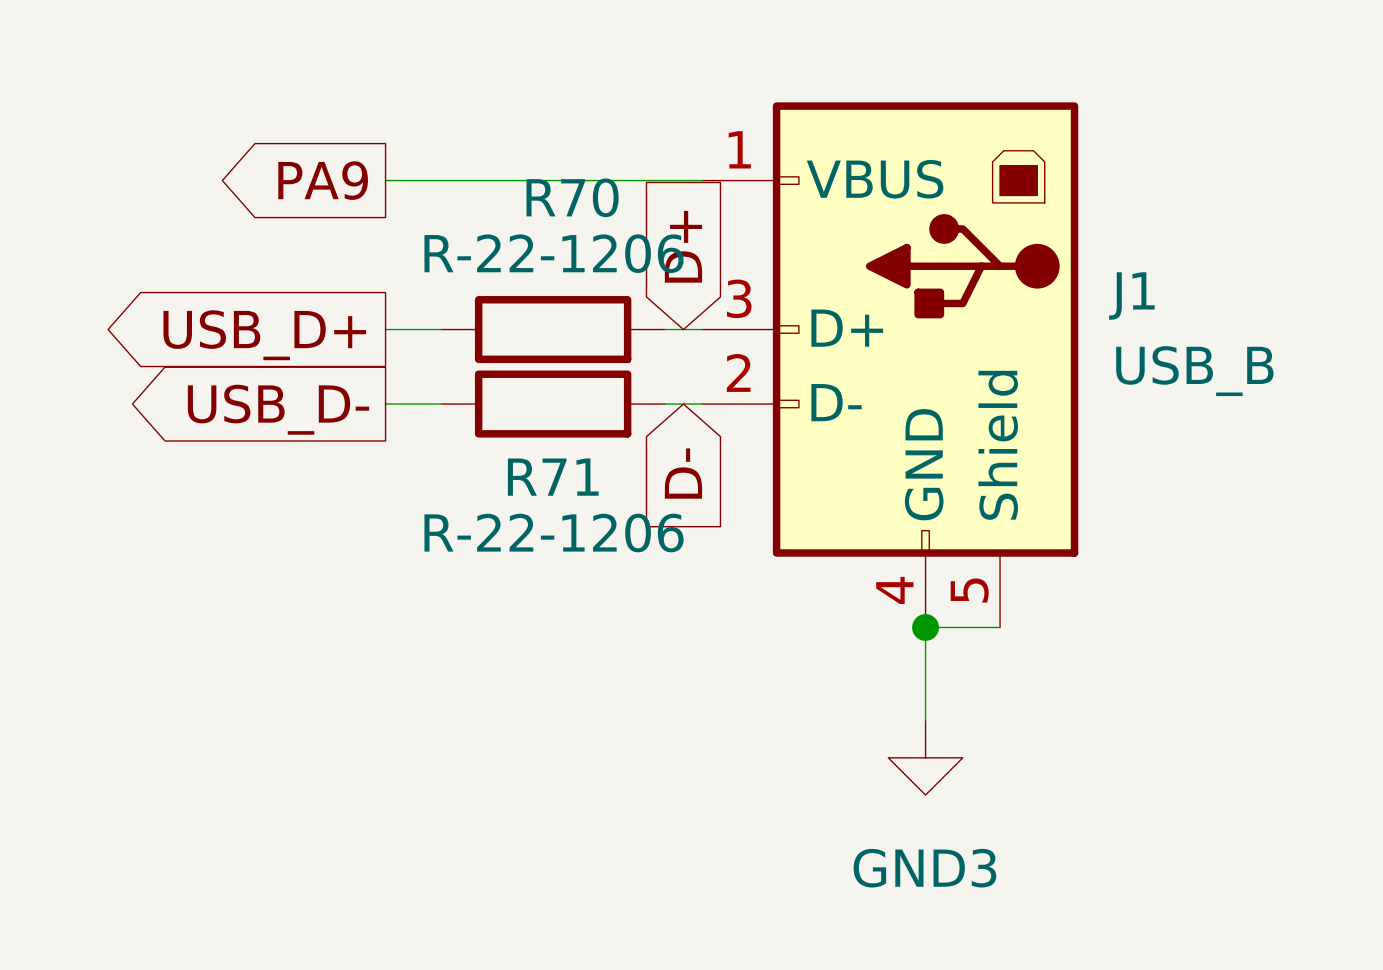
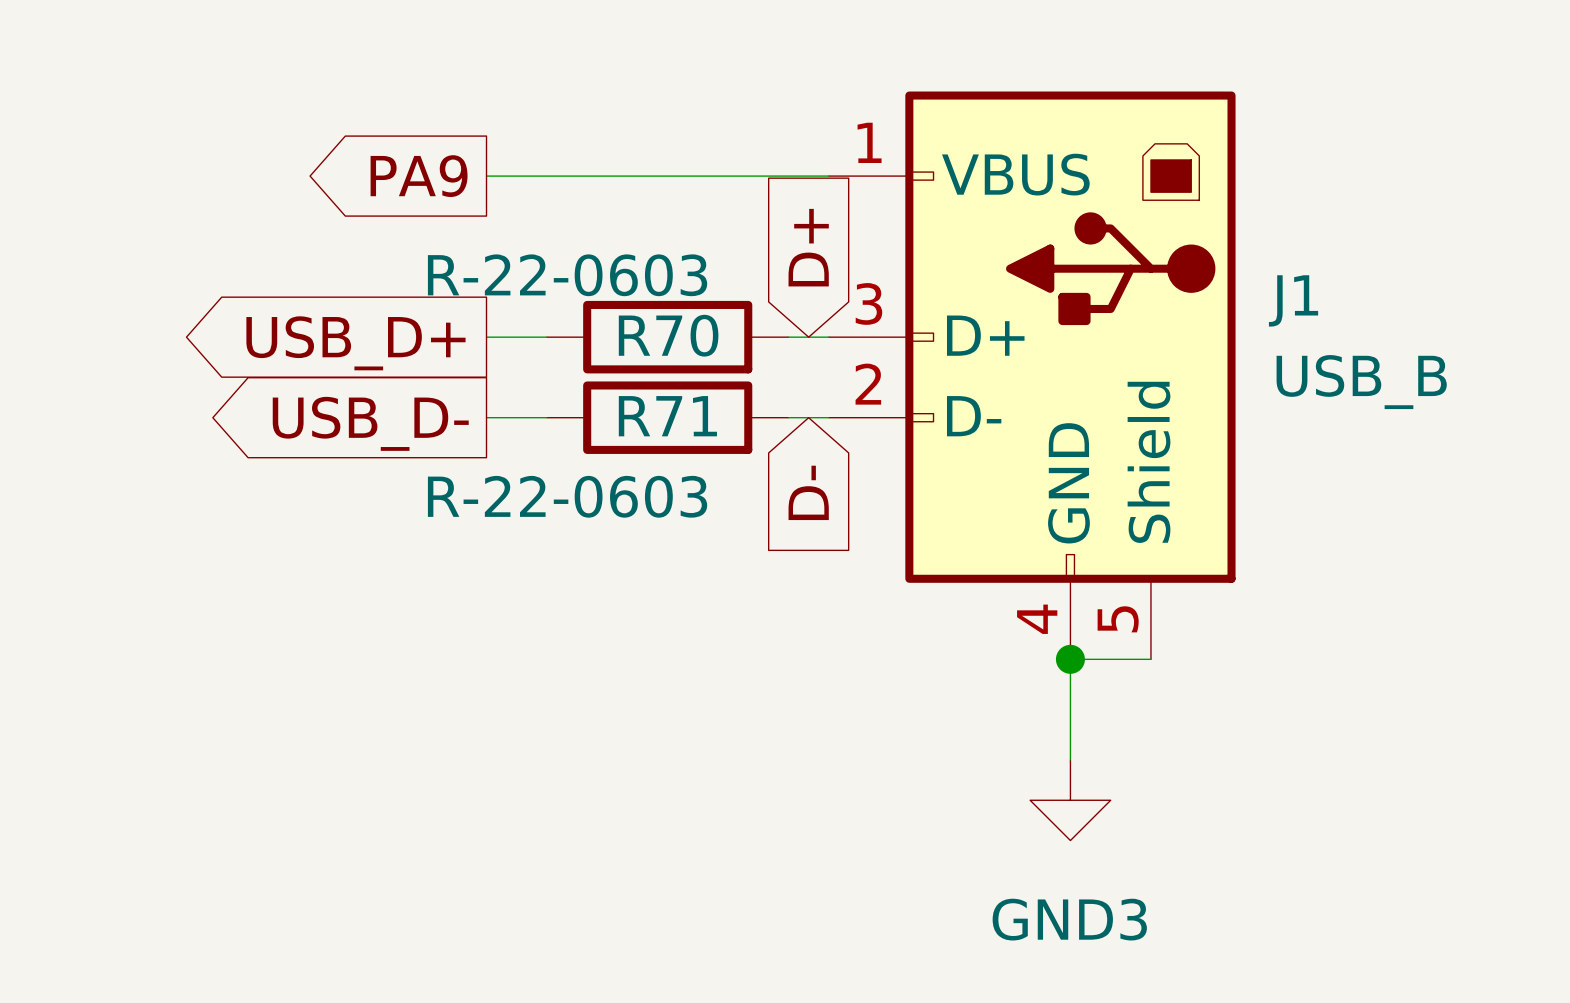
R70 name position: R70 (572, 197) -> R70 (668, 335)
R70 value: R-22-1206 (554, 253) -> R-22-0603 (567, 275)
R71 name position: R71 (553, 477) -> R71 (667, 416)
R71 value: R-22-1206 (554, 533) -> R-22-0603 (567, 496)

